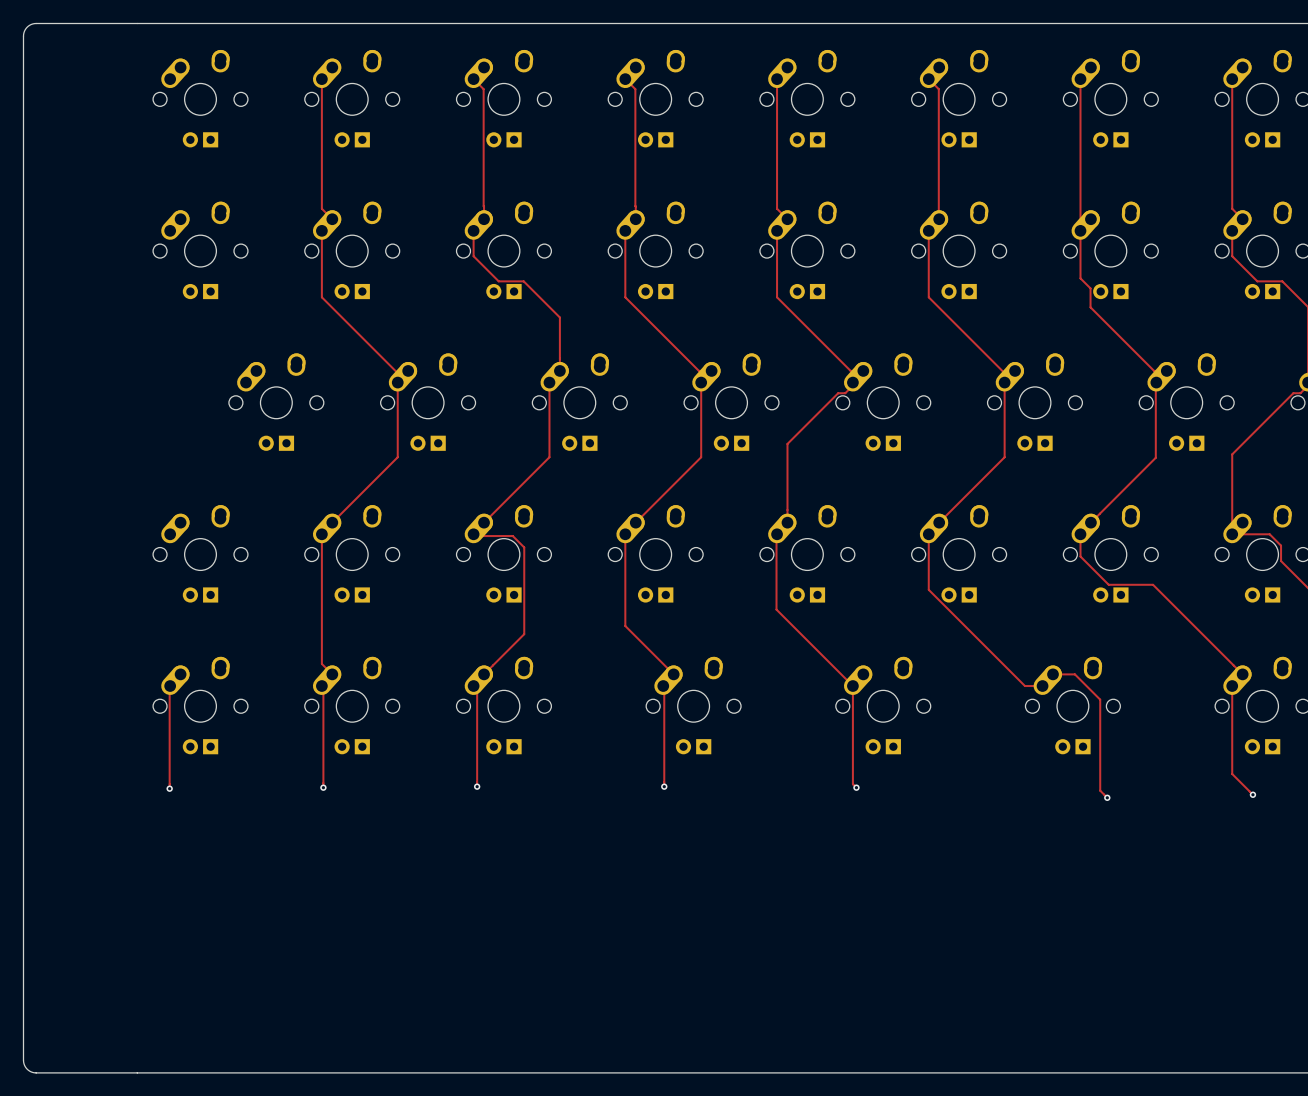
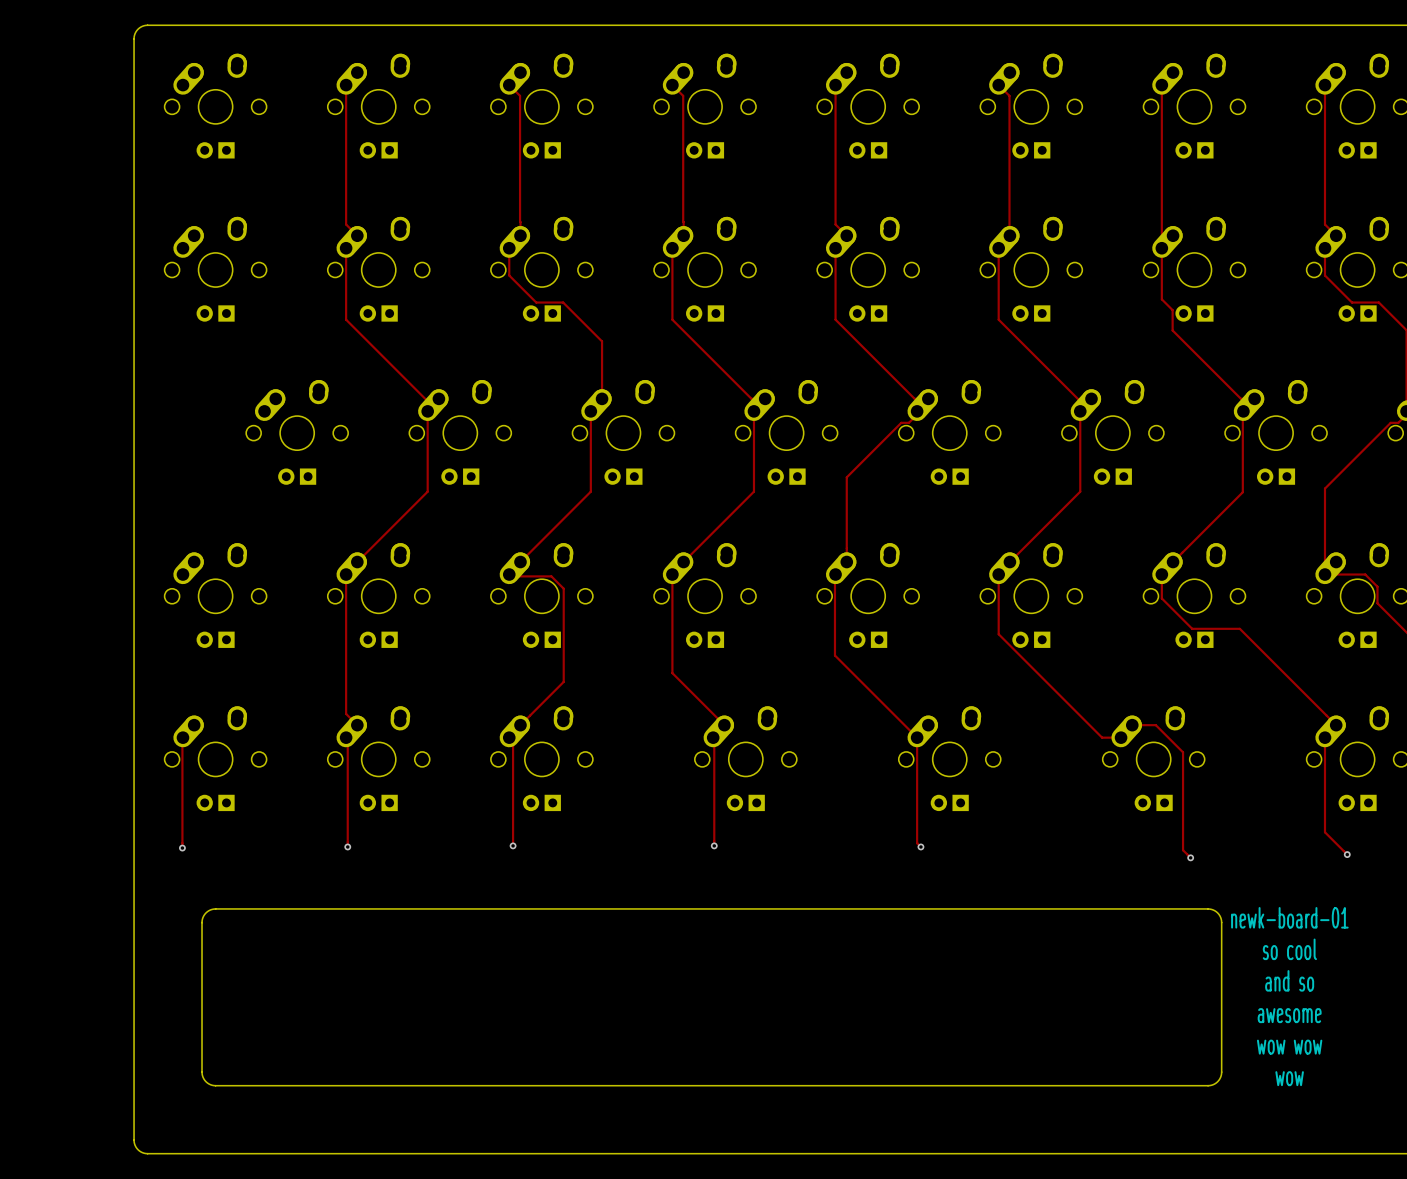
board edge: (137, 23) (34, 23) (26, 28) (23, 36) (23, 1061) (27, 1069) (34, 1072) (137, 1072) -> (134, 38) (134, 1140) (138, 1149) (147, 1153)
board edge: none -> (147, 25) (138, 29) (134, 38)
board edge: none -> (215, 908) (1209, 909) (1217, 912) (1221, 920) (1221, 1073) (1217, 1081) (1208, 1085) (213, 1085) (205, 1081) (202, 1073) (202, 922) (205, 912) (215, 908)
text: none -> newk-board-01 (1289, 917)
text: none -> so cool (1289, 949)
text: none -> and so (1289, 980)
text: none -> awesome (1289, 1015)
text: none -> wow wow (1289, 1047)
text: none -> wow (1289, 1078)

